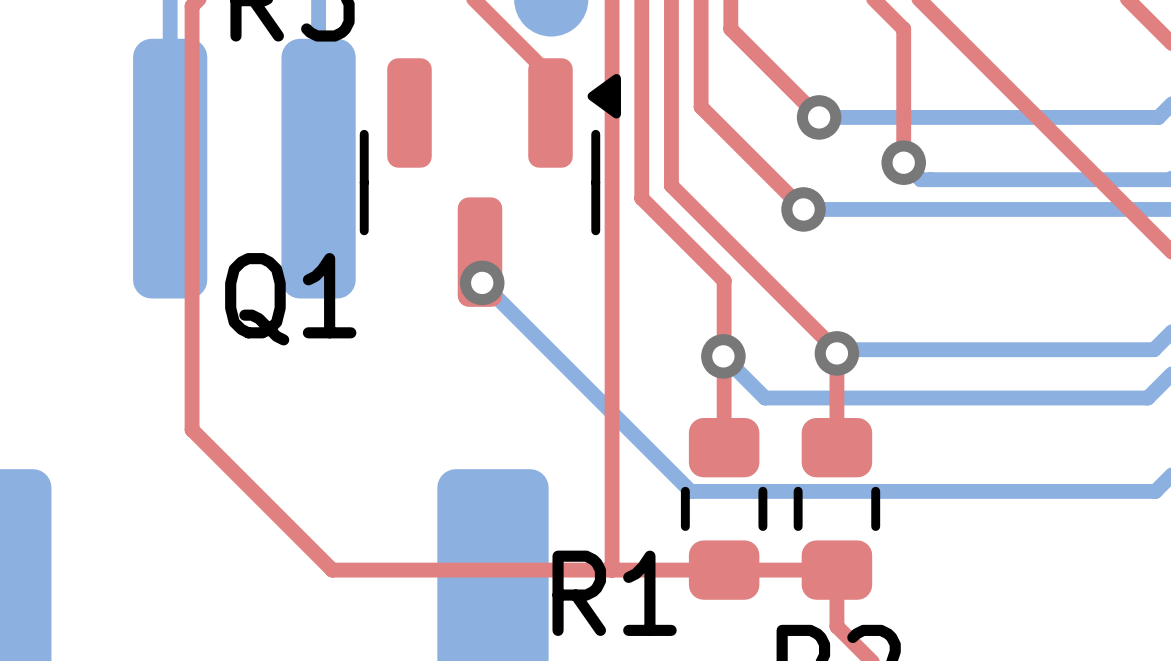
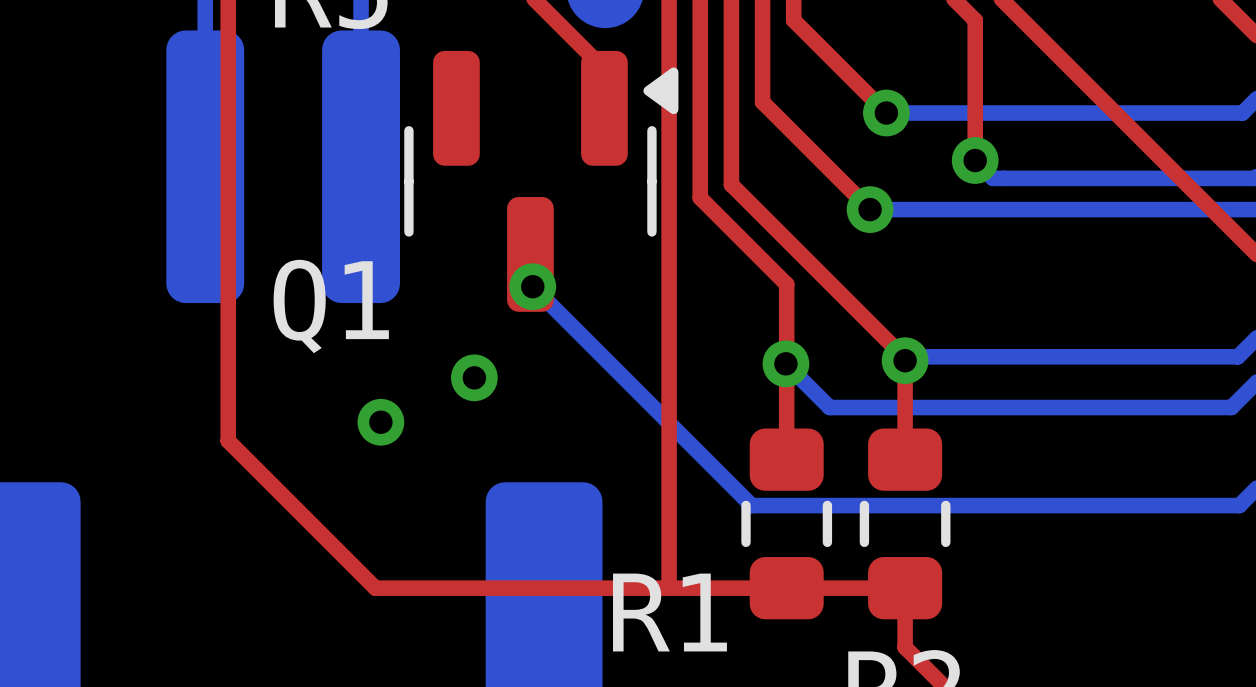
via: none -> (474, 377)
via: none -> (380, 422)

